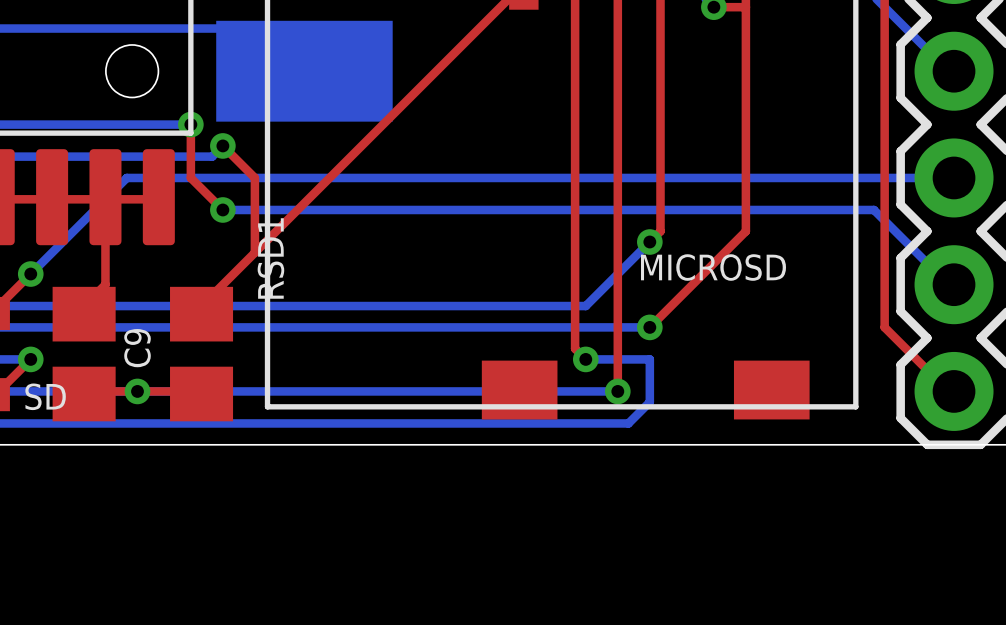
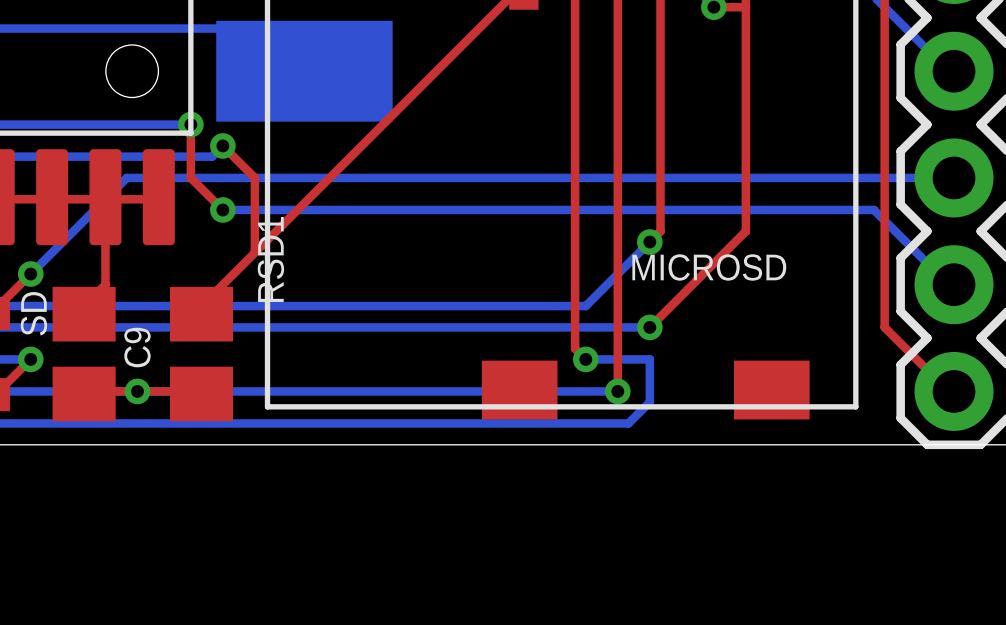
SD name rotation: 0° (45, 396) -> 90° counterclockwise (33, 313)
SD name position: SD (45, 396) -> SD (33, 313)

